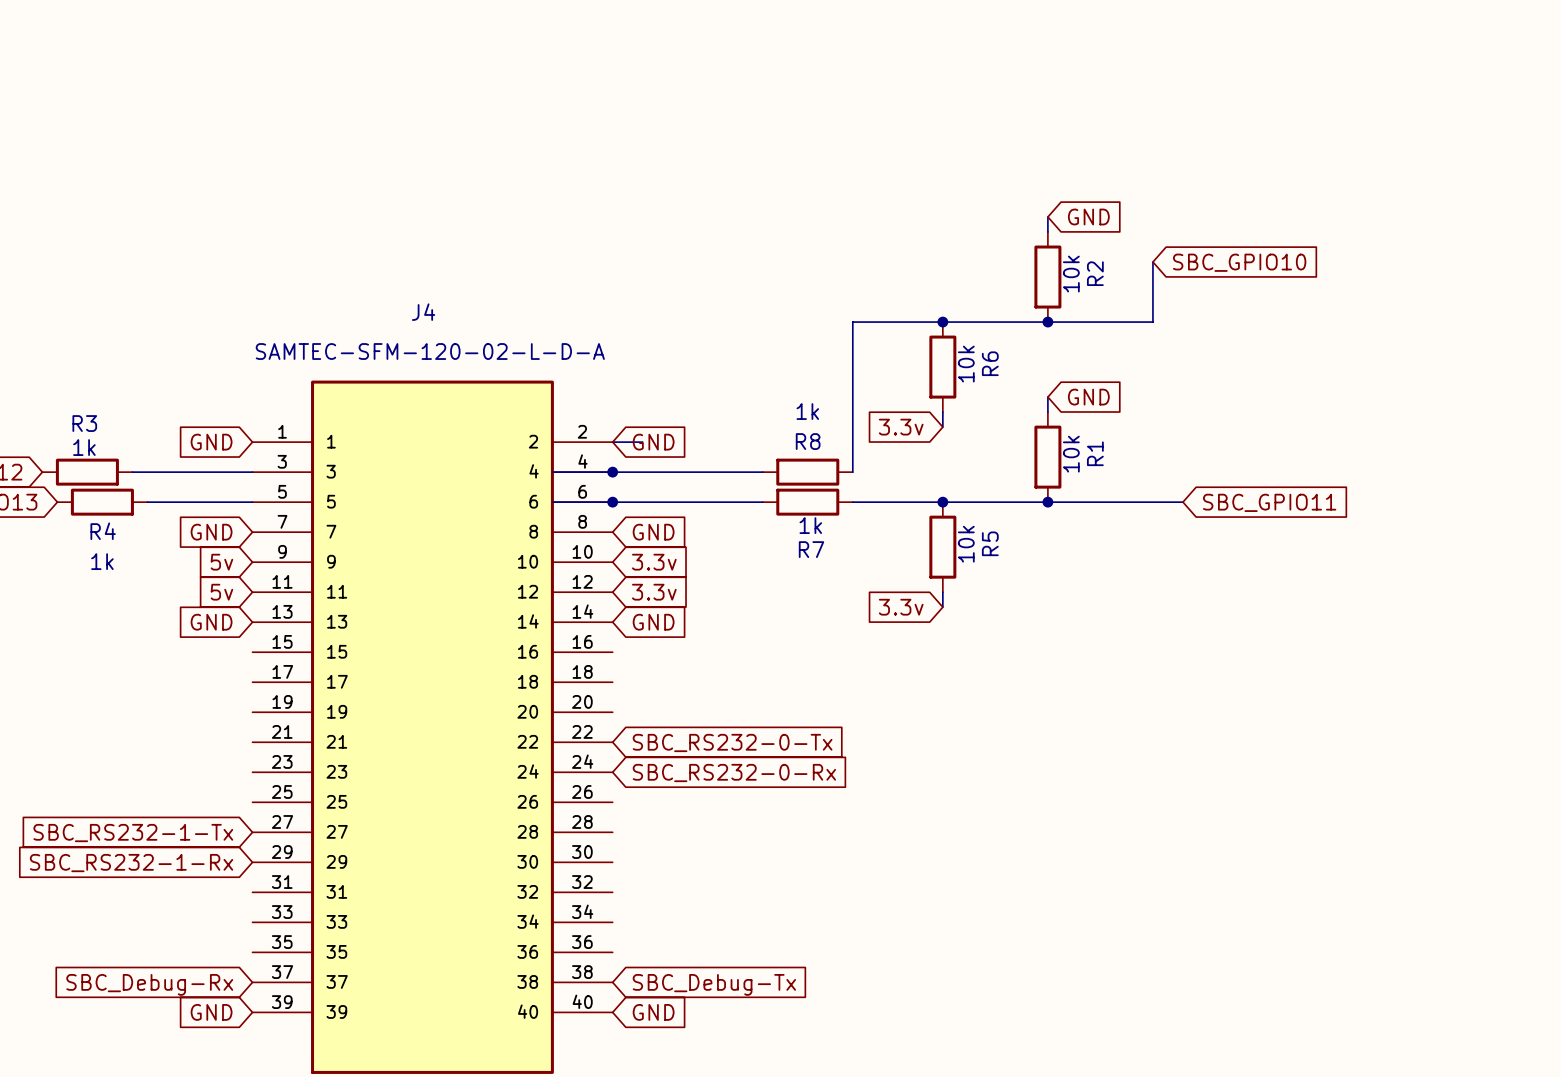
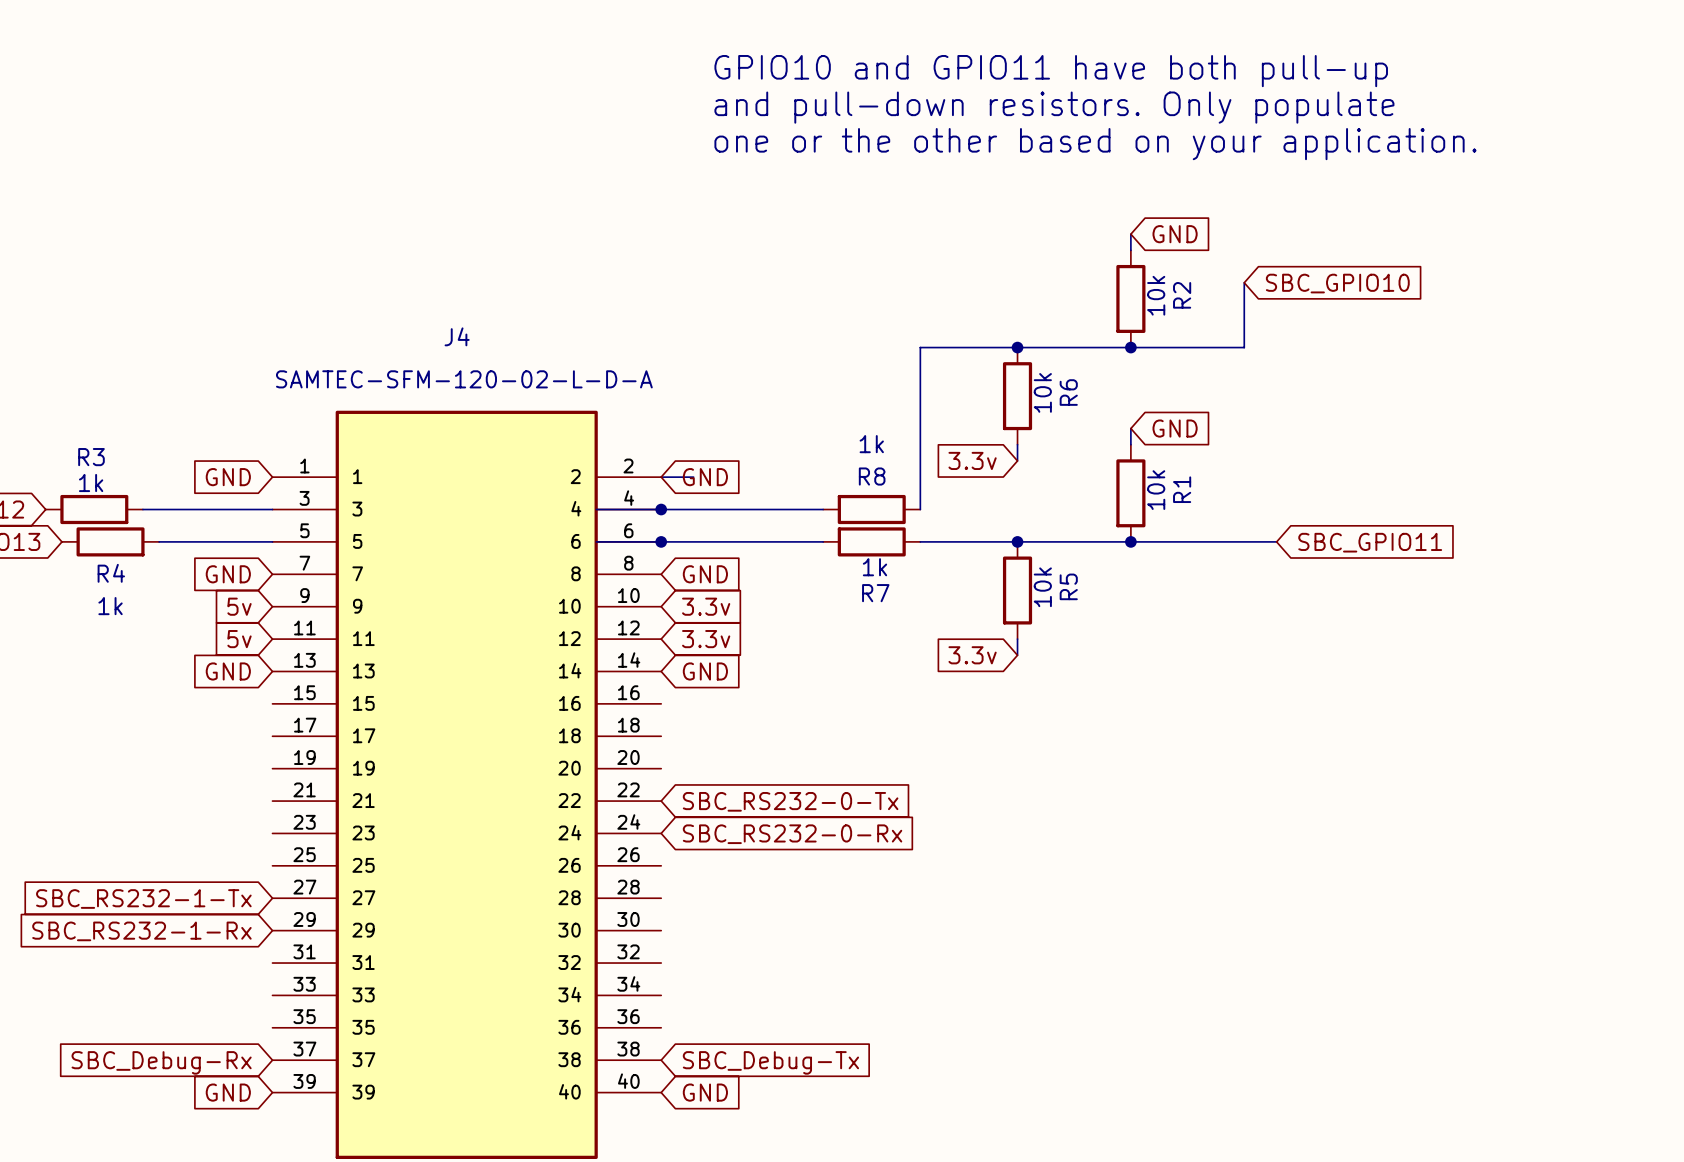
text: none -> GPIO10 and GPIO11 have both pull-up (1051, 71)
text: none -> and pull-down resistors. Only populate (1054, 107)
text: none -> one or the other based on your application. (1095, 144)

